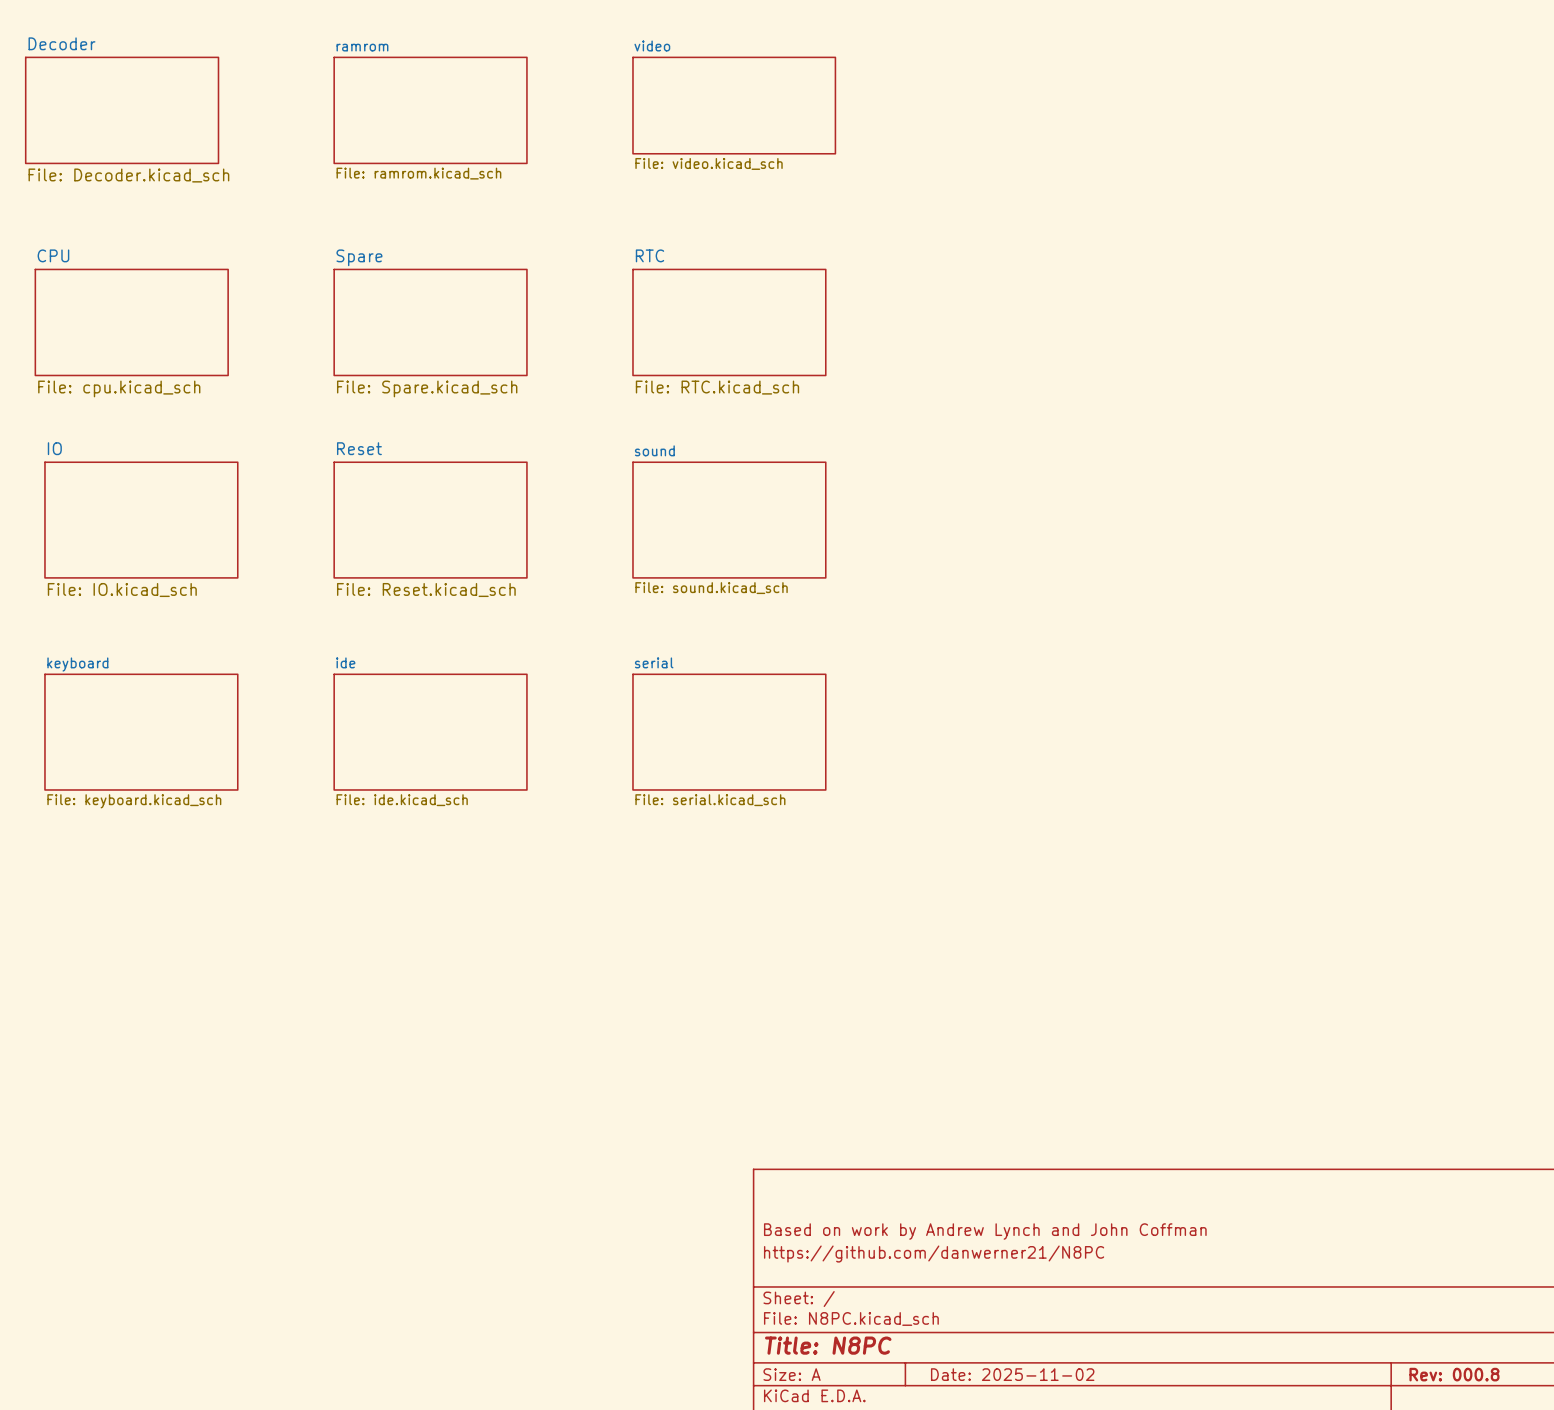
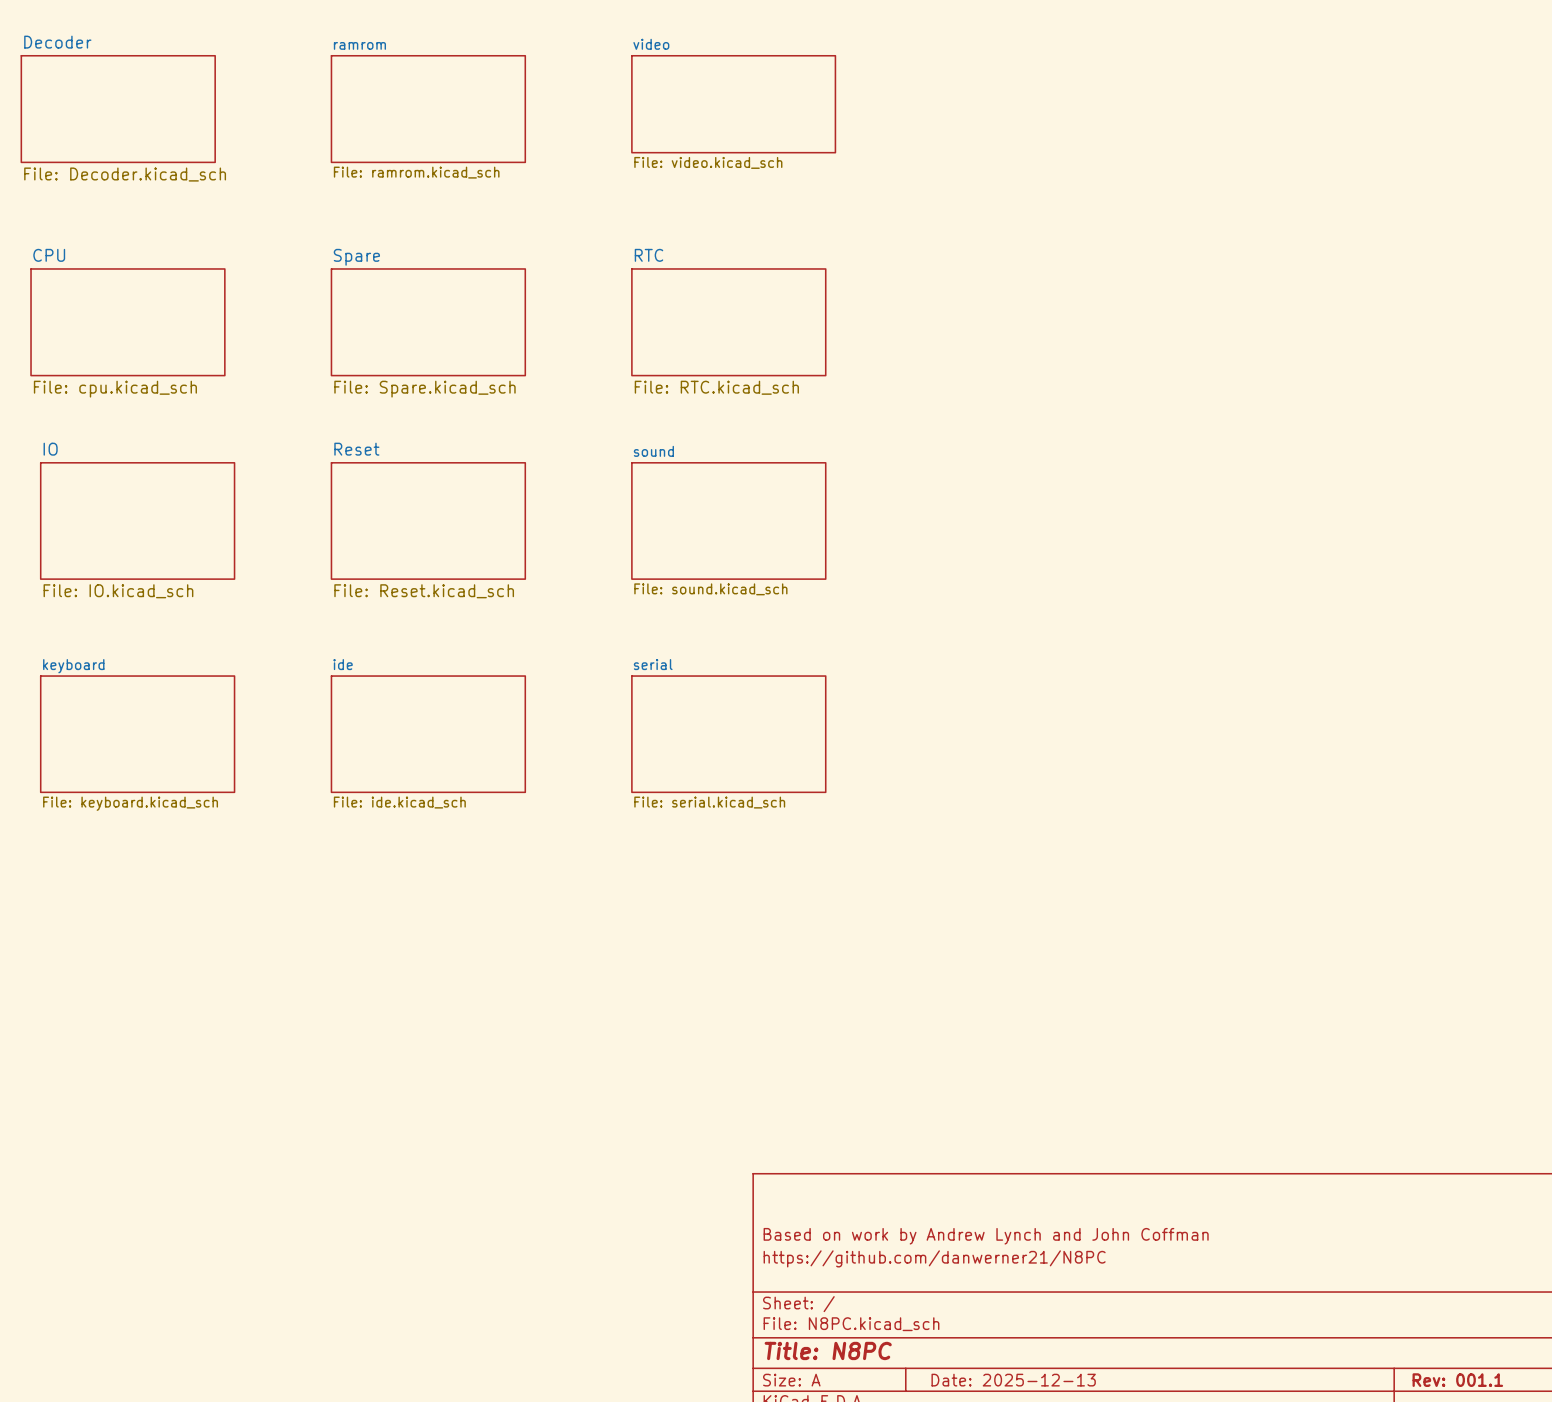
title block: Date: 2025-11-02 (1012, 1374) -> Date: 2025-12-13 (1013, 1380)
title block: Rev: 000.8 (1454, 1374) -> Rev: 001.1 (1457, 1380)

